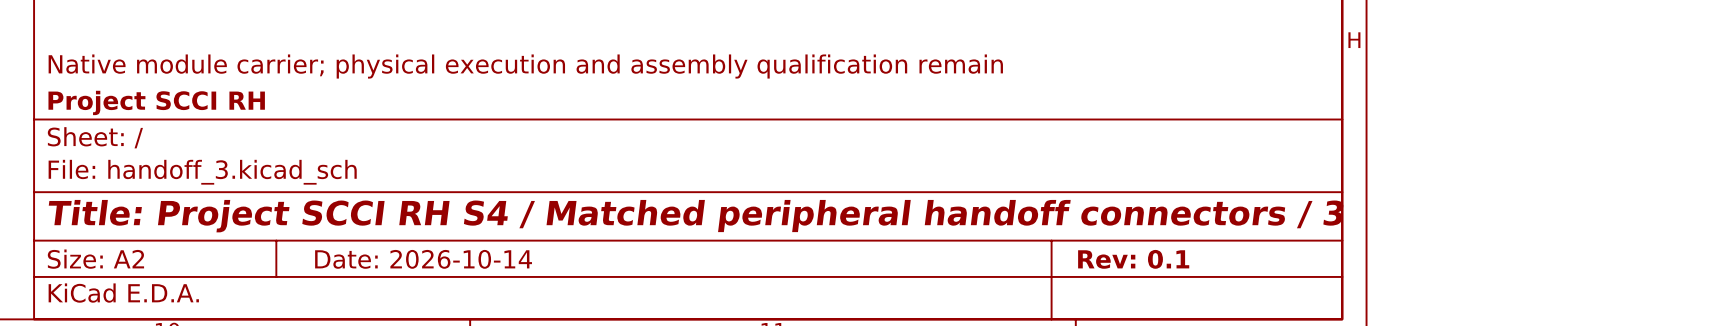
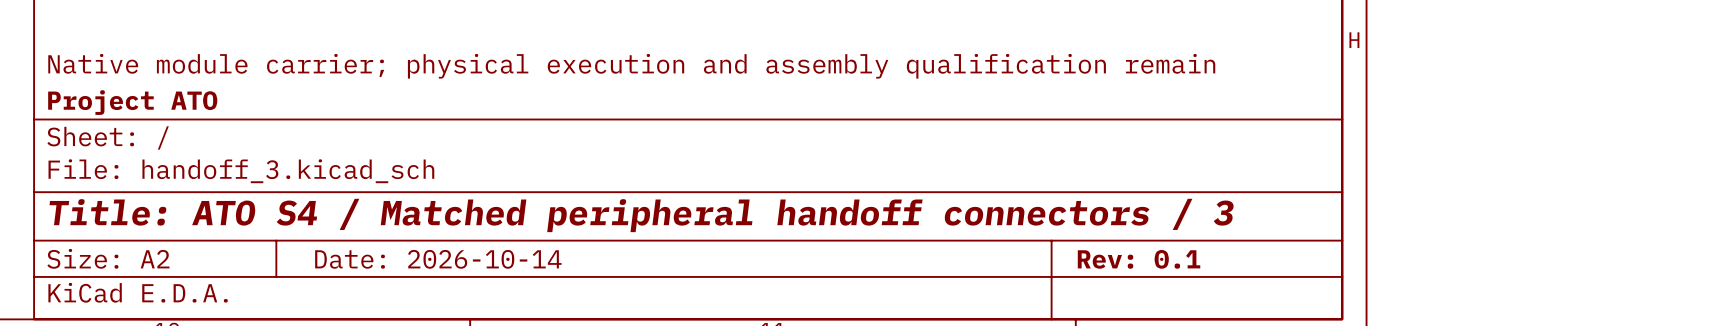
title block: Project SCCI RH (156, 102) -> Project ATO (132, 102)
title block: Title: Project SCCI RH S4 / Matched peripheral handoff connectors / 3 (696, 216) -> Title: ATO S4 / Matched peripheral handoff connectors / 3 (641, 215)

